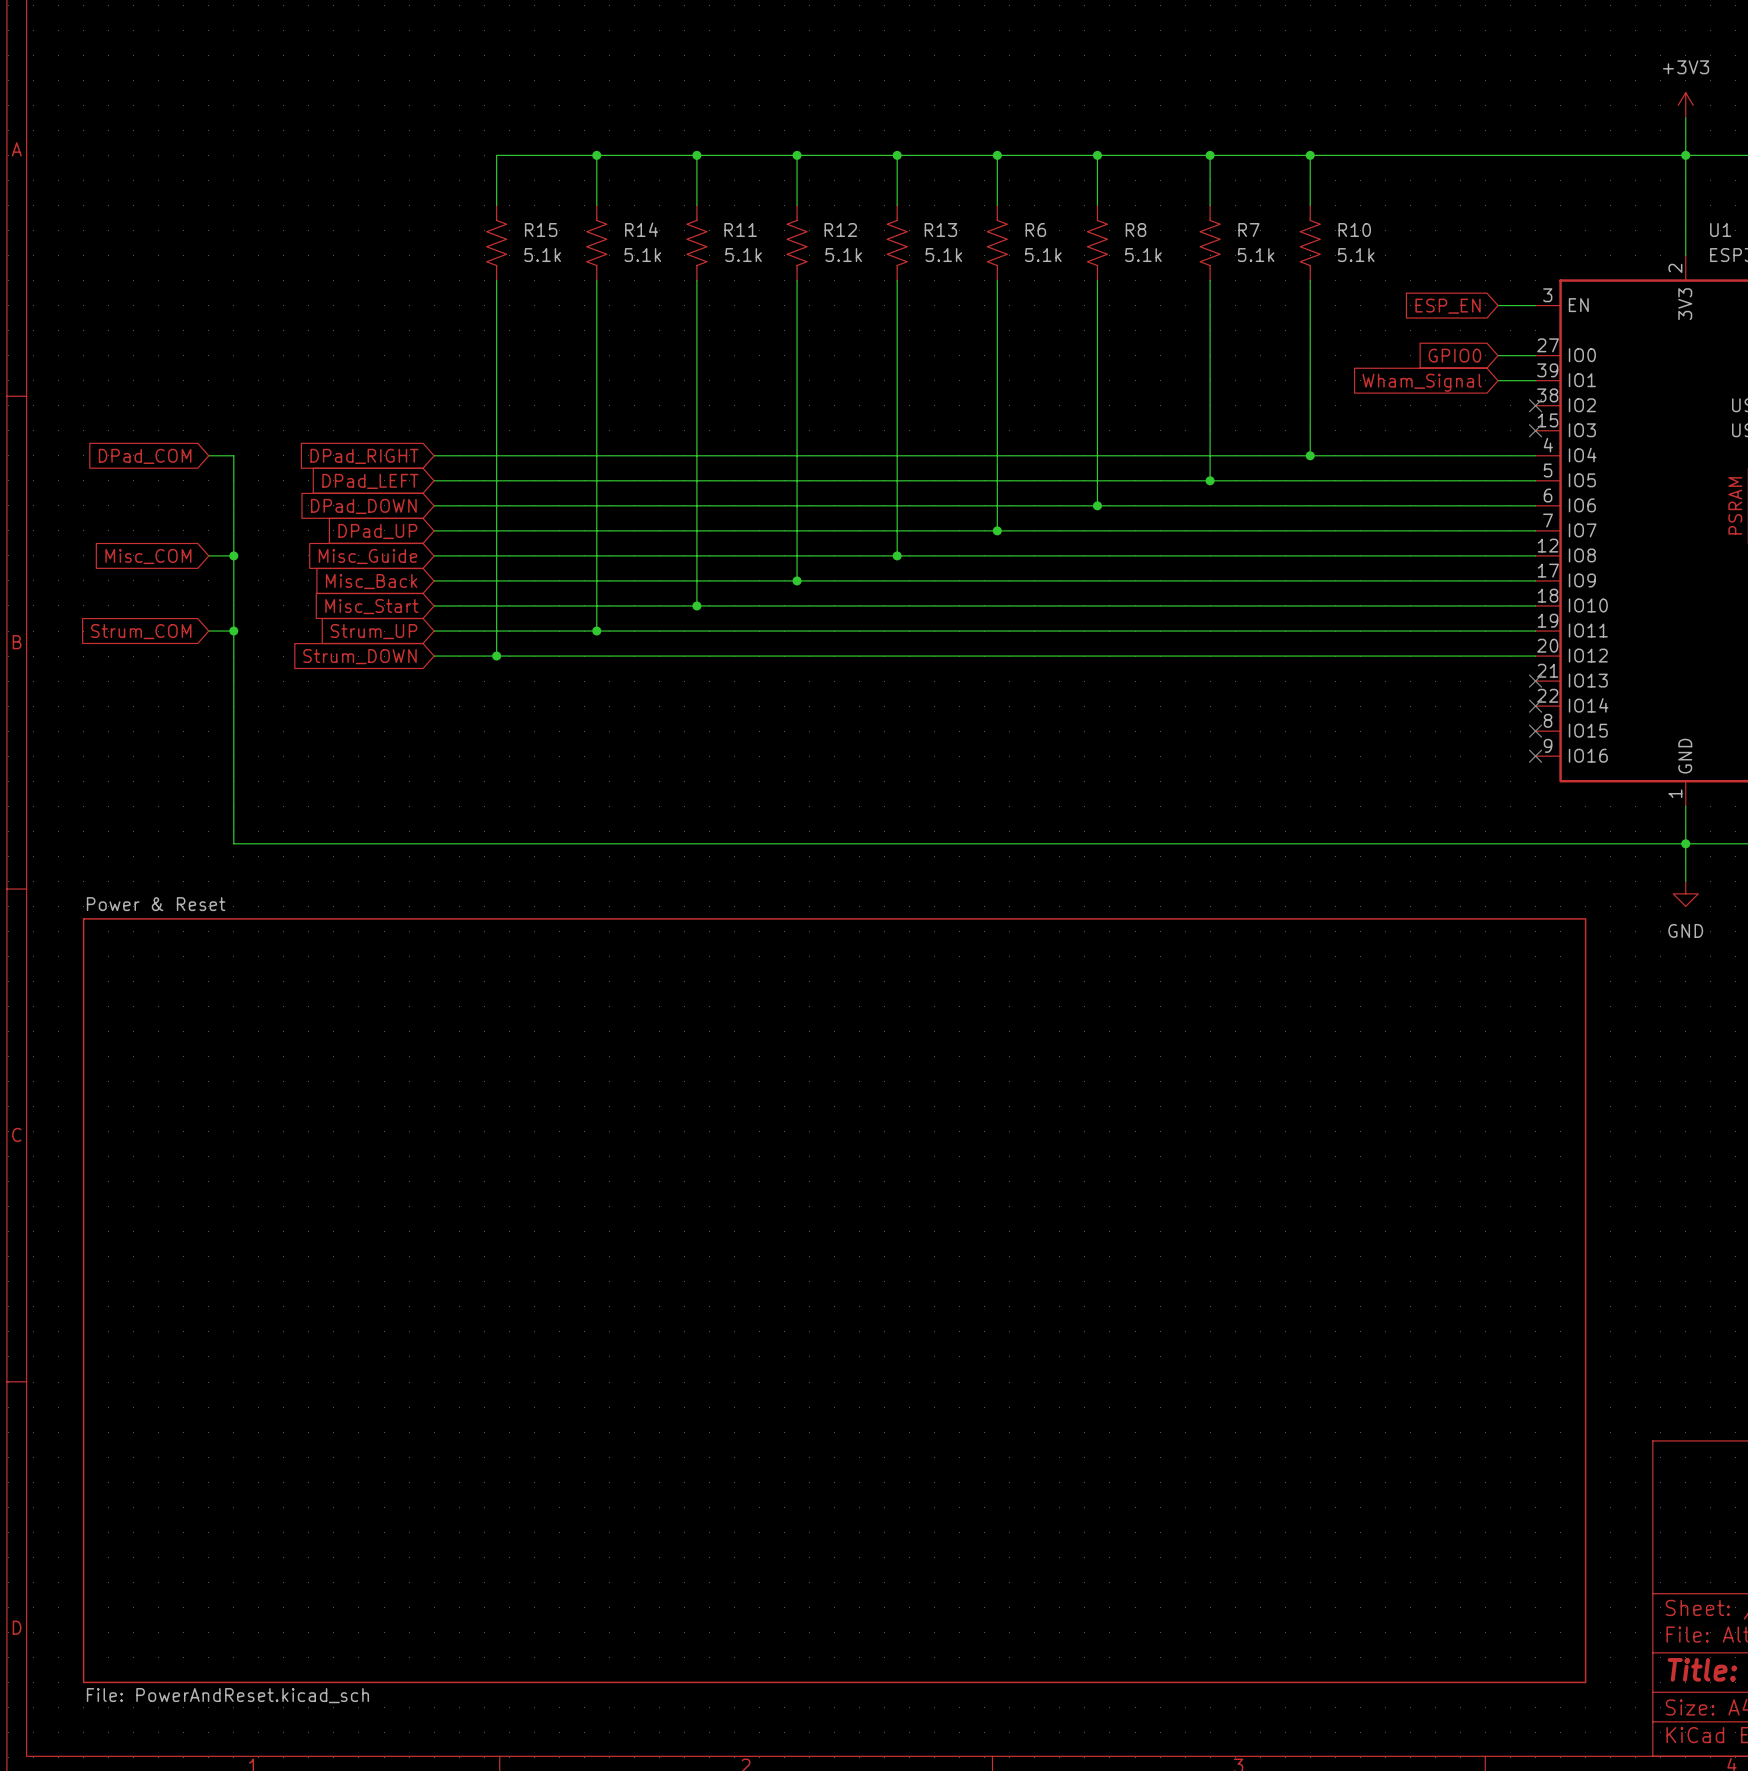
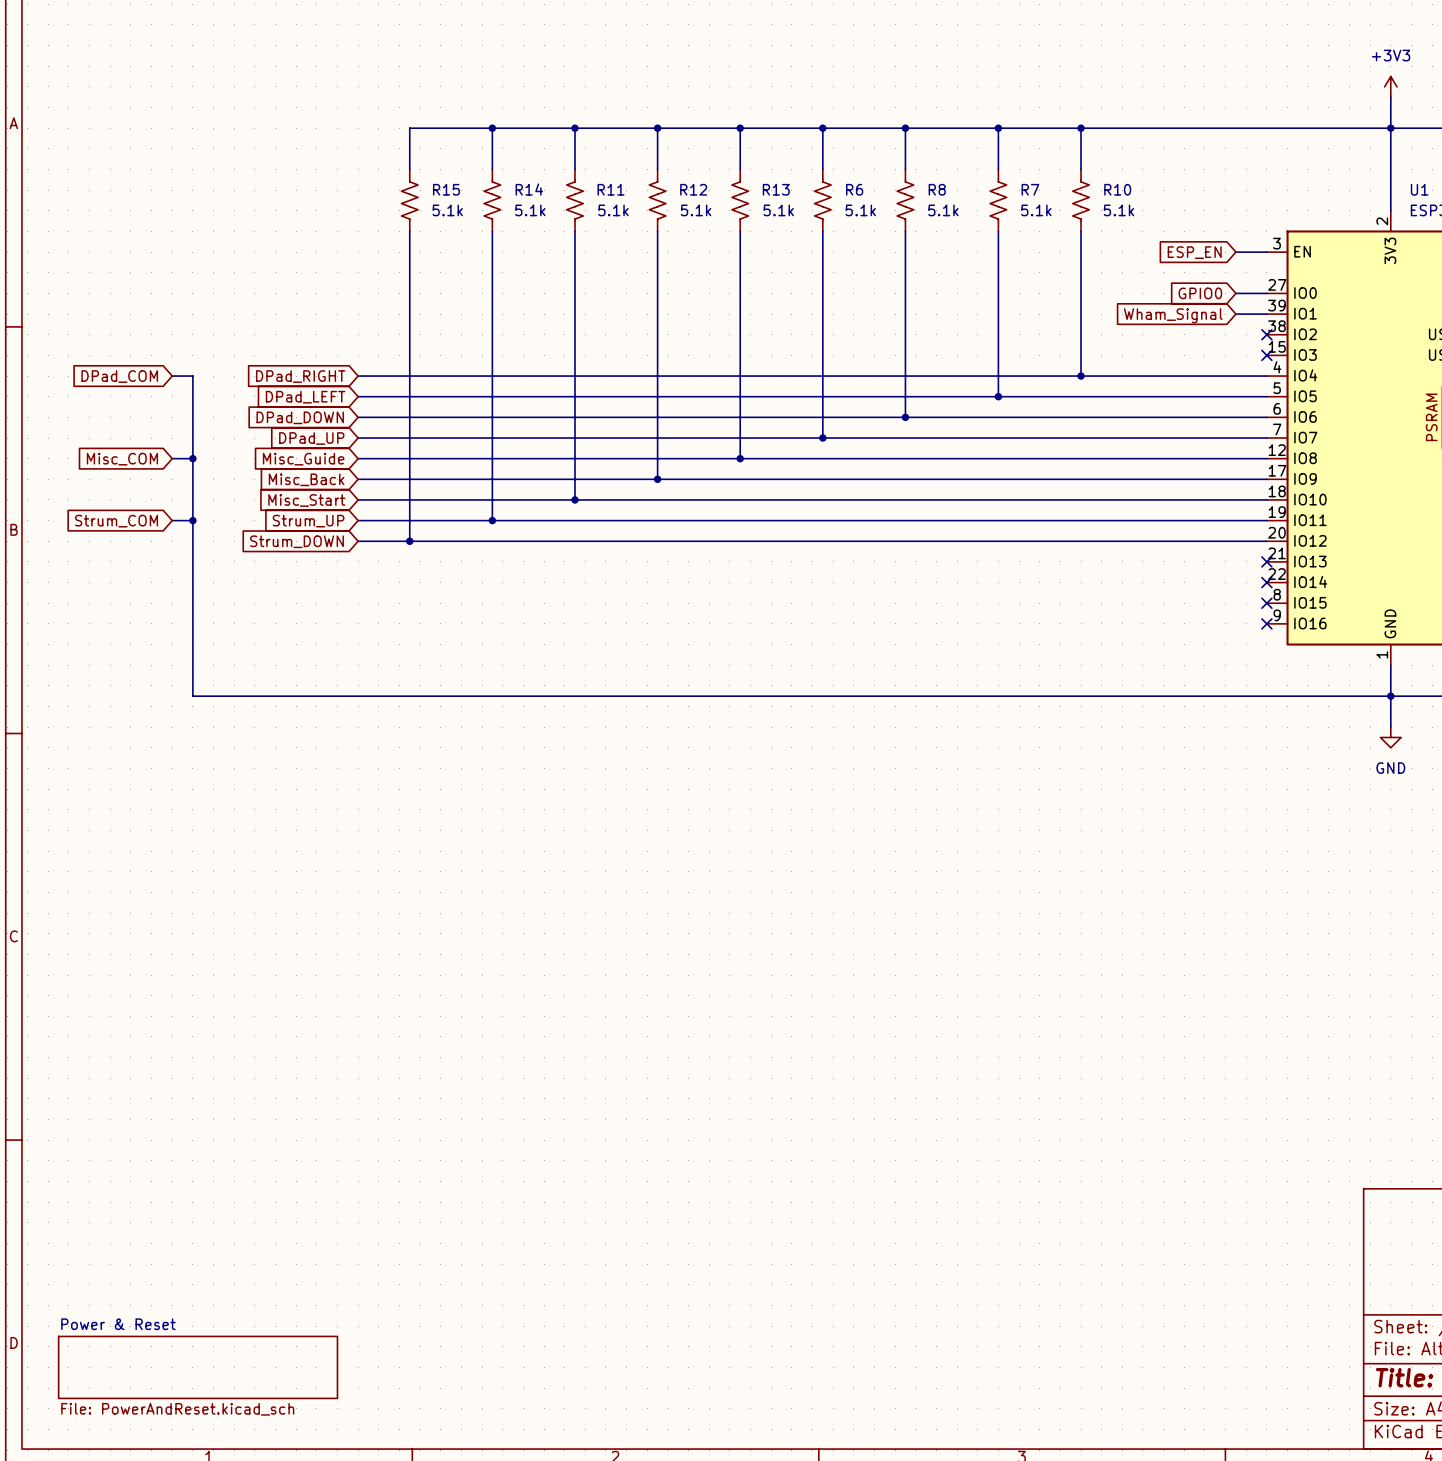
sheet Power & Reset: File: PowerAndReset.kicad_sch (834, 1300) -> none
sheet Power & Reset: none -> File: PowerAndReset.kicad_sch (198, 1367)

